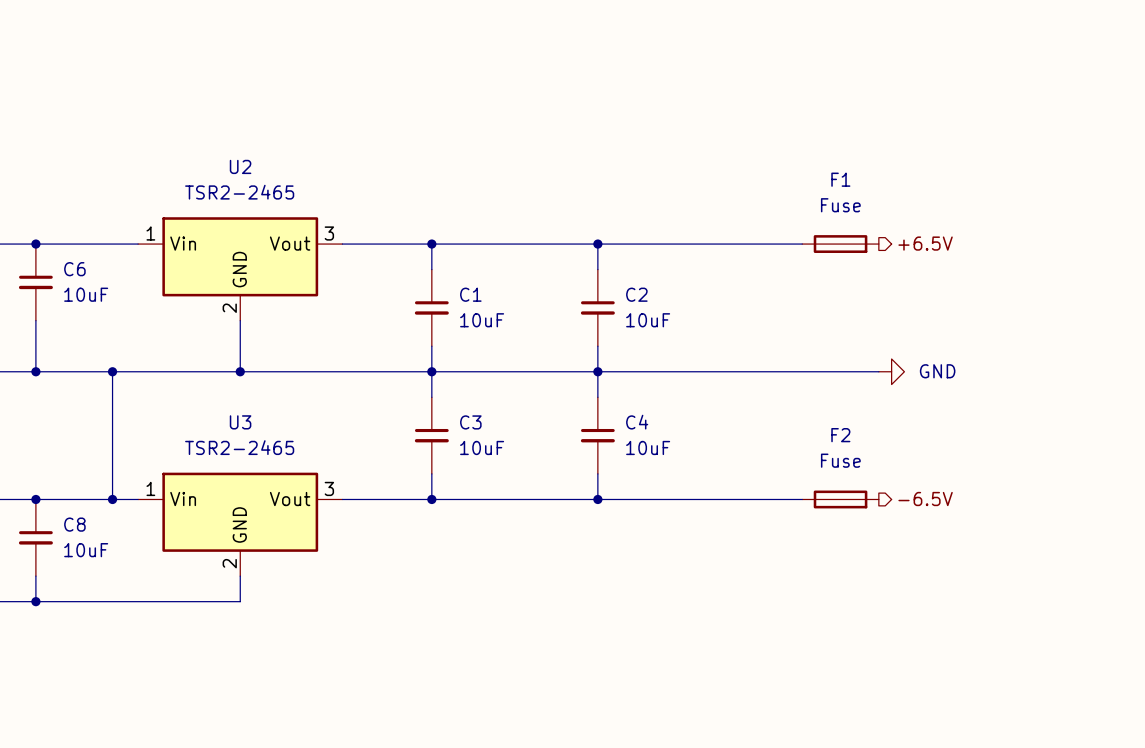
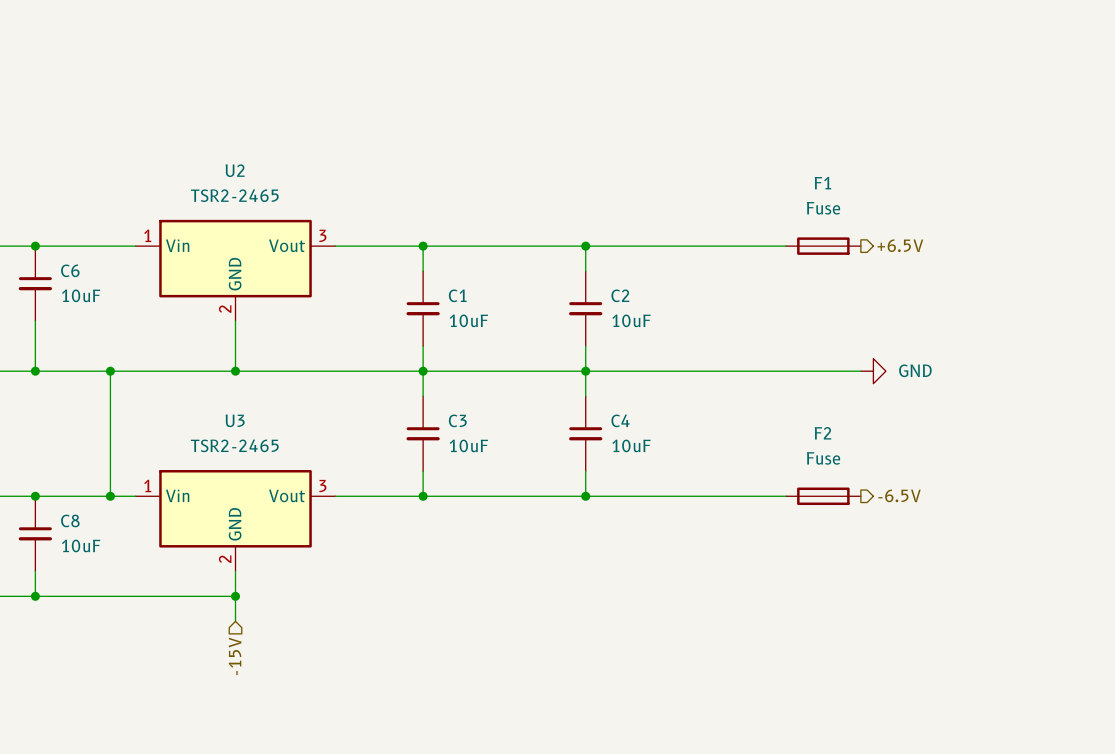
wire: none -> (235, 596) (235, 621)
junction: none -> (235, 596)
hierarchical label: none -> -15V (235, 656)

